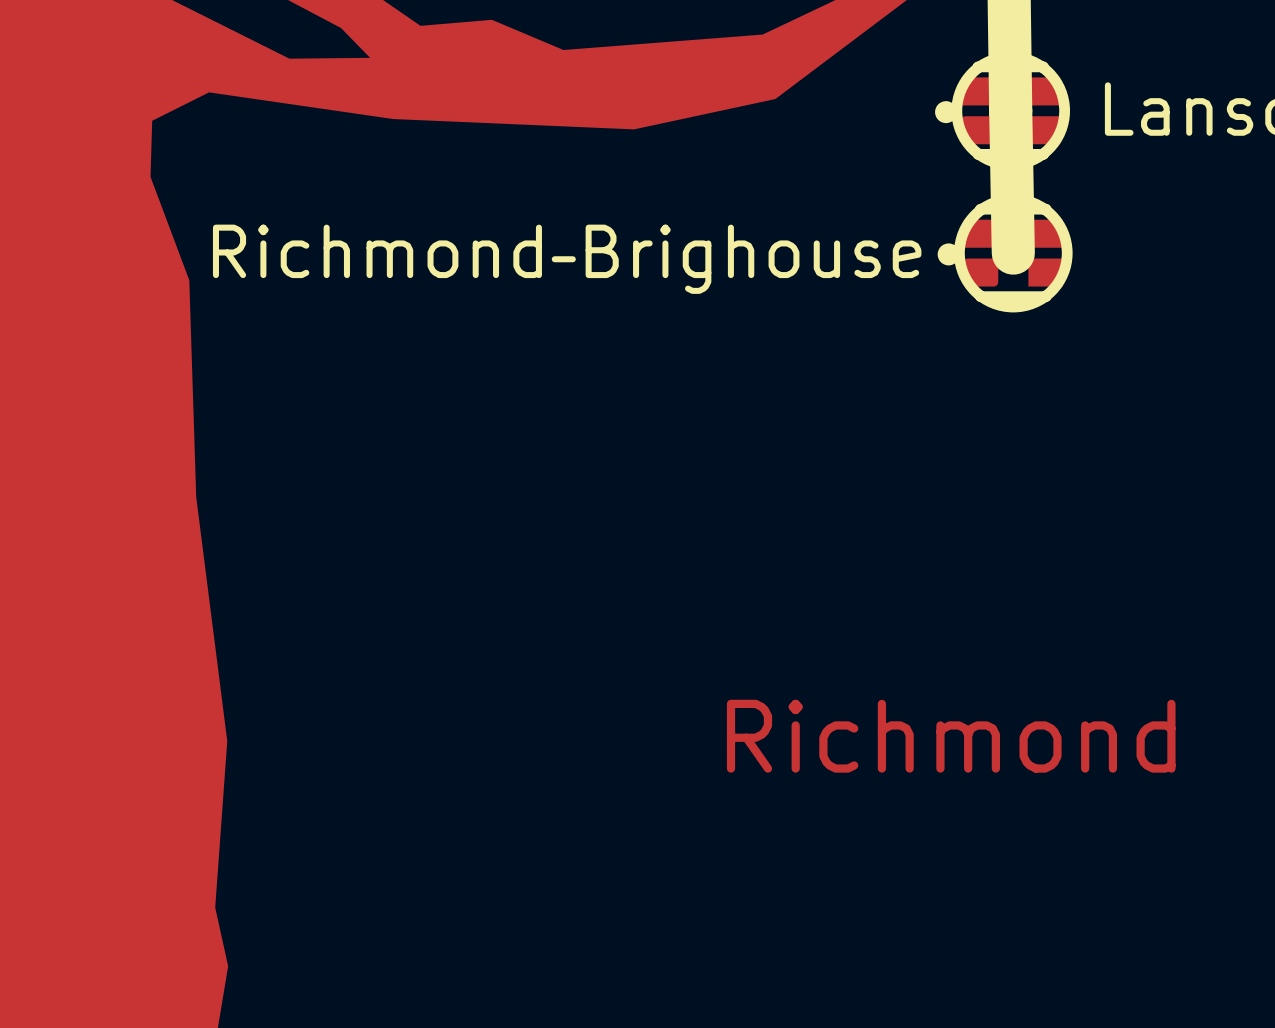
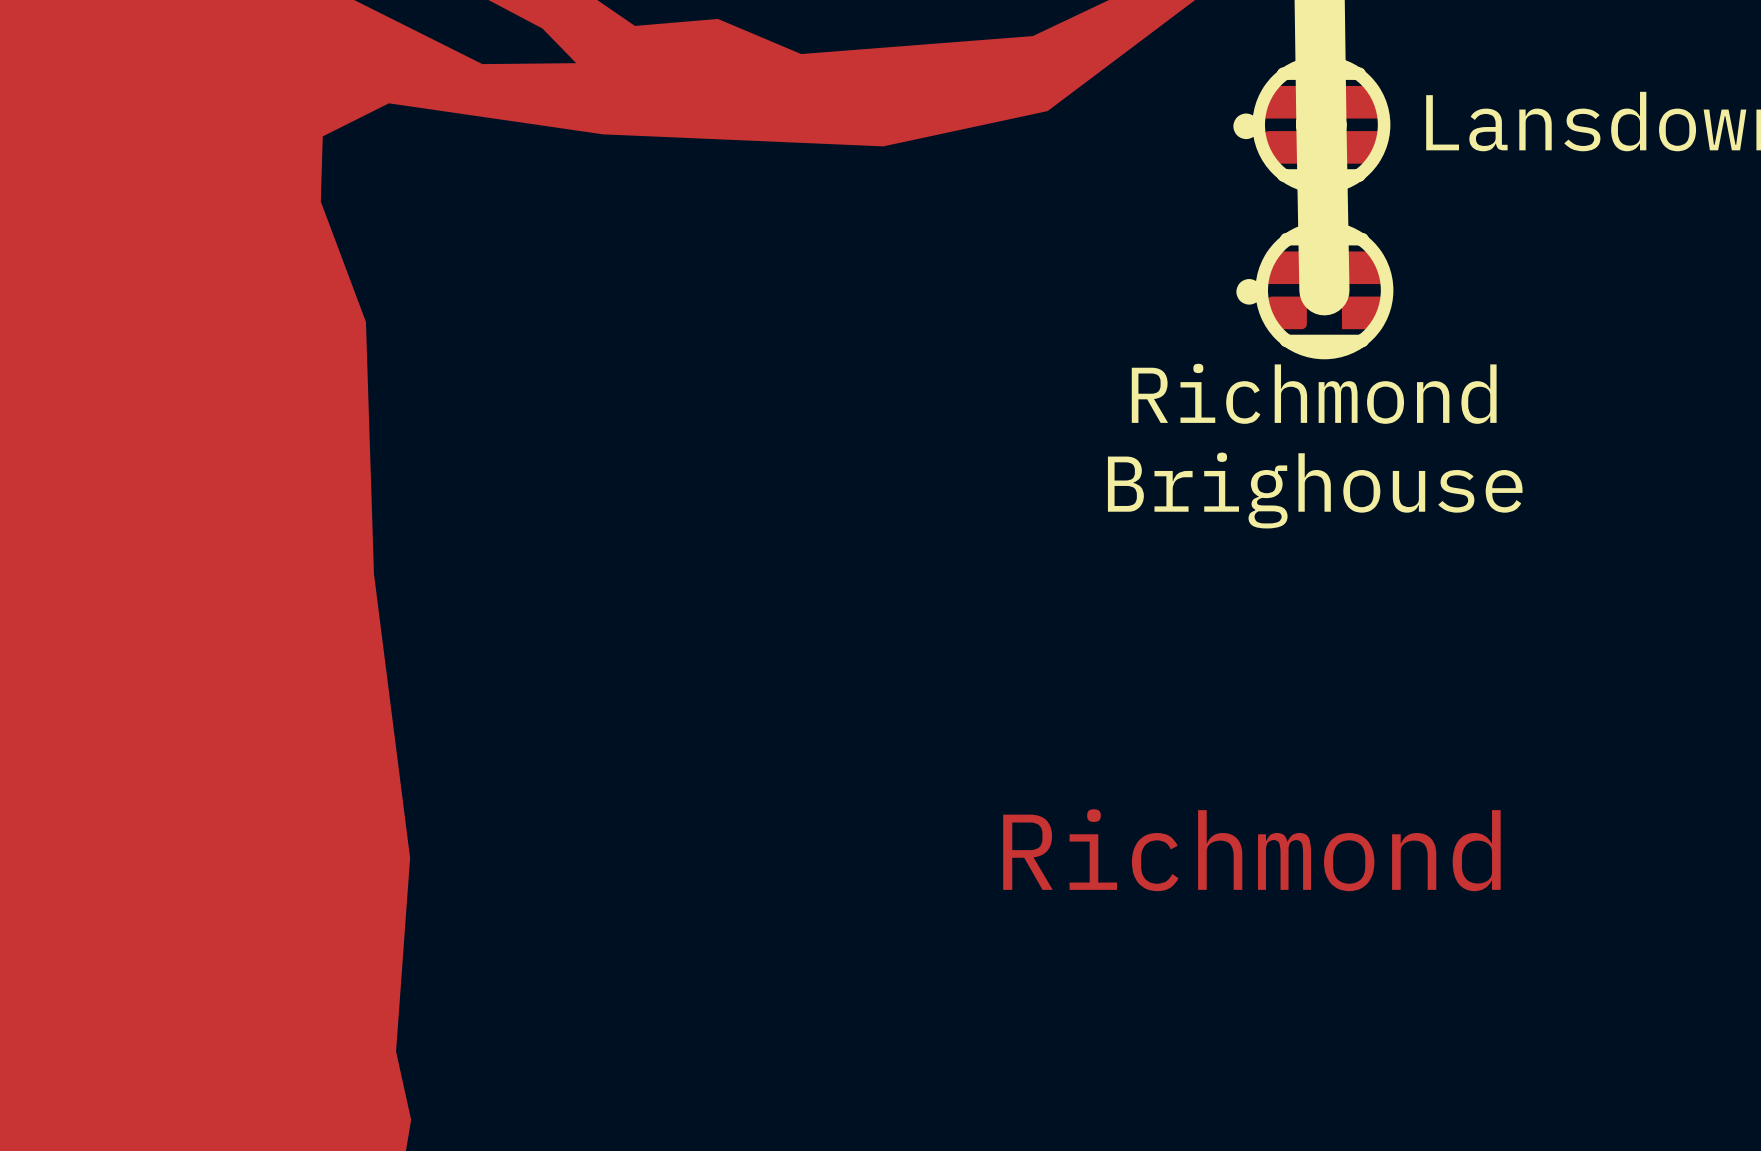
text: Richmond–Brighouse (567, 259) -> Richmond (1314, 393)
text: none -> Brighouse (1315, 490)

